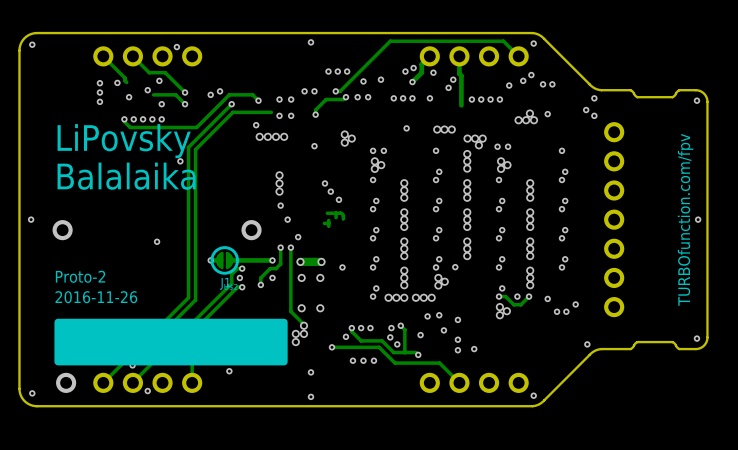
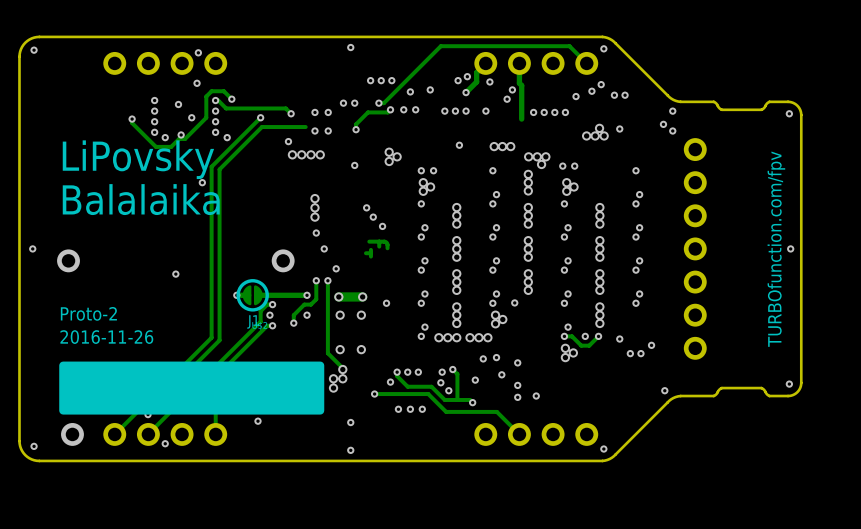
track: (103, 56) (125, 78) (126, 82) -> none
track: (132, 56) (149, 72) (165, 72) (185, 92) -> none
via: none -> (197, 83)
via: (159, 80) -> none
via: (117, 82) -> none
via: (99, 83) -> none
track: none -> (231, 99) (223, 91) (211, 91) (206, 96) (206, 117) (185, 138) (179, 138) (171, 146) (155, 146) (132, 123) (132, 119)
via: none -> (231, 99)
via: none -> (154, 100)
via: none -> (215, 100)
via: (147, 90) -> none
via: (220, 91) -> none
via: (99, 92) -> none
via: none -> (178, 104)
via: (185, 92) -> none
track: (153, 94) (175, 94) (185, 104) -> none
via: (210, 94) -> none
track: (253, 96) (229, 94) (196, 127) (130, 127) (124, 119) -> (285, 108) (226, 108) (218, 100) (215, 100)
via: (129, 97) -> none
via: none -> (154, 111)
via: none -> (215, 111)
via: (99, 101) -> none
via: (161, 104) -> none
via: none -> (191, 117)
via: (185, 104) -> none
via: none -> (132, 119)
via: none -> (154, 121)
via: none -> (215, 121)
via: none -> (154, 132)
via: none -> (215, 132)
via: (124, 119) -> none
via: (133, 119) -> none
via: (143, 119) -> none
via: (152, 119) -> none
via: none -> (165, 137)
via: none -> (227, 137)

